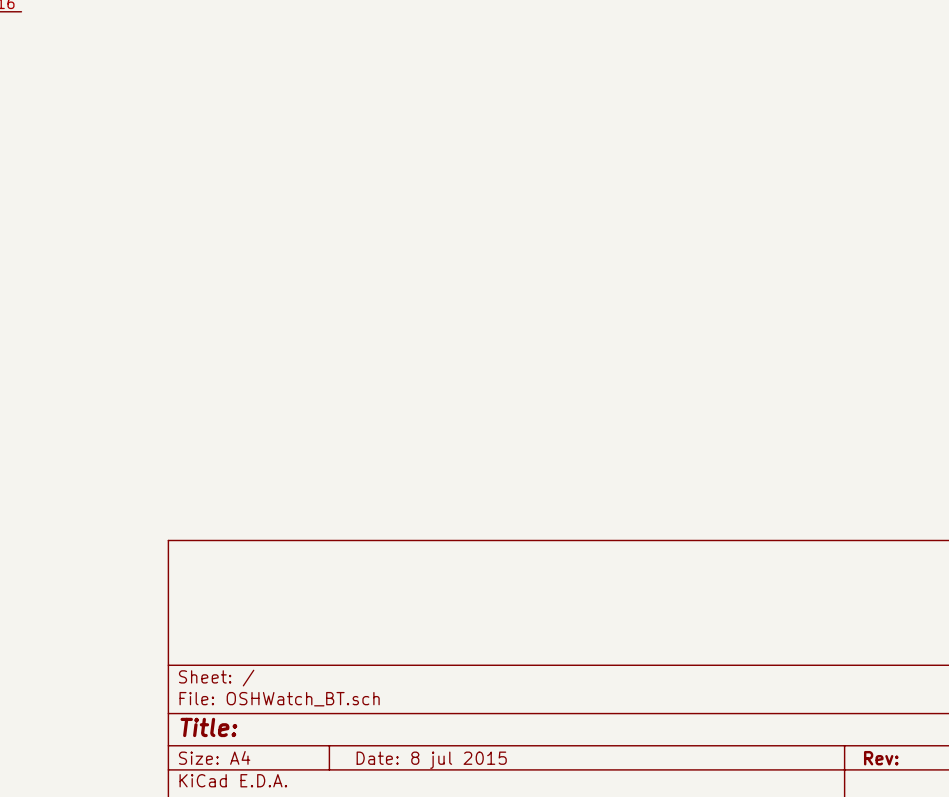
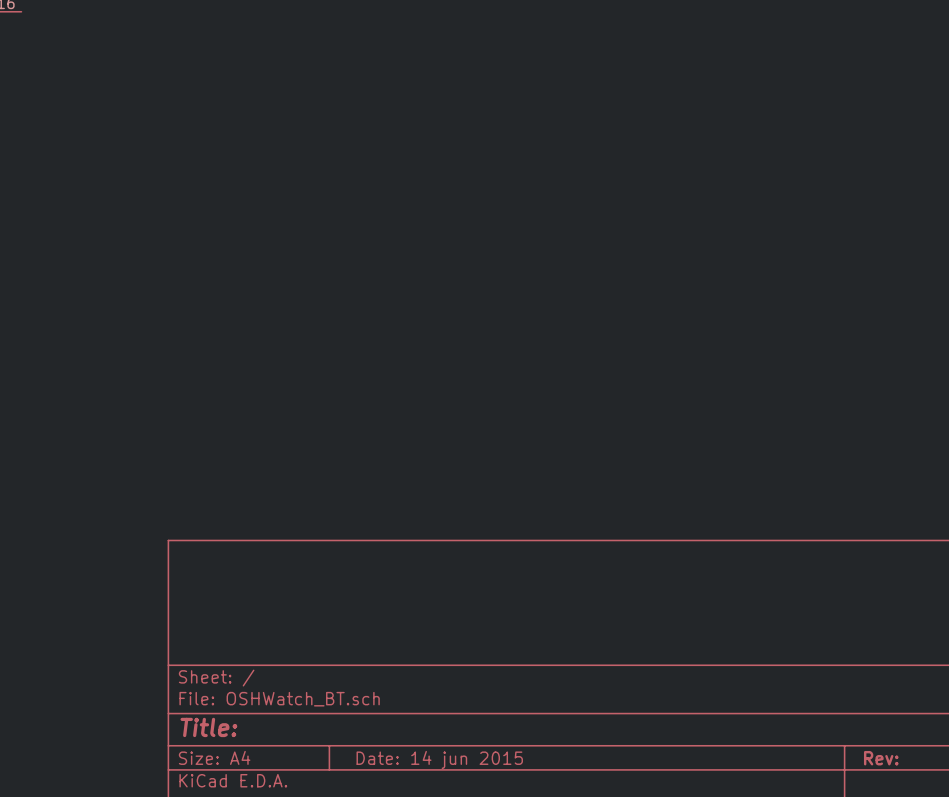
title block: Date: 8 jul 2015 (431, 760) -> Date: 14 jun 2015 (439, 759)

